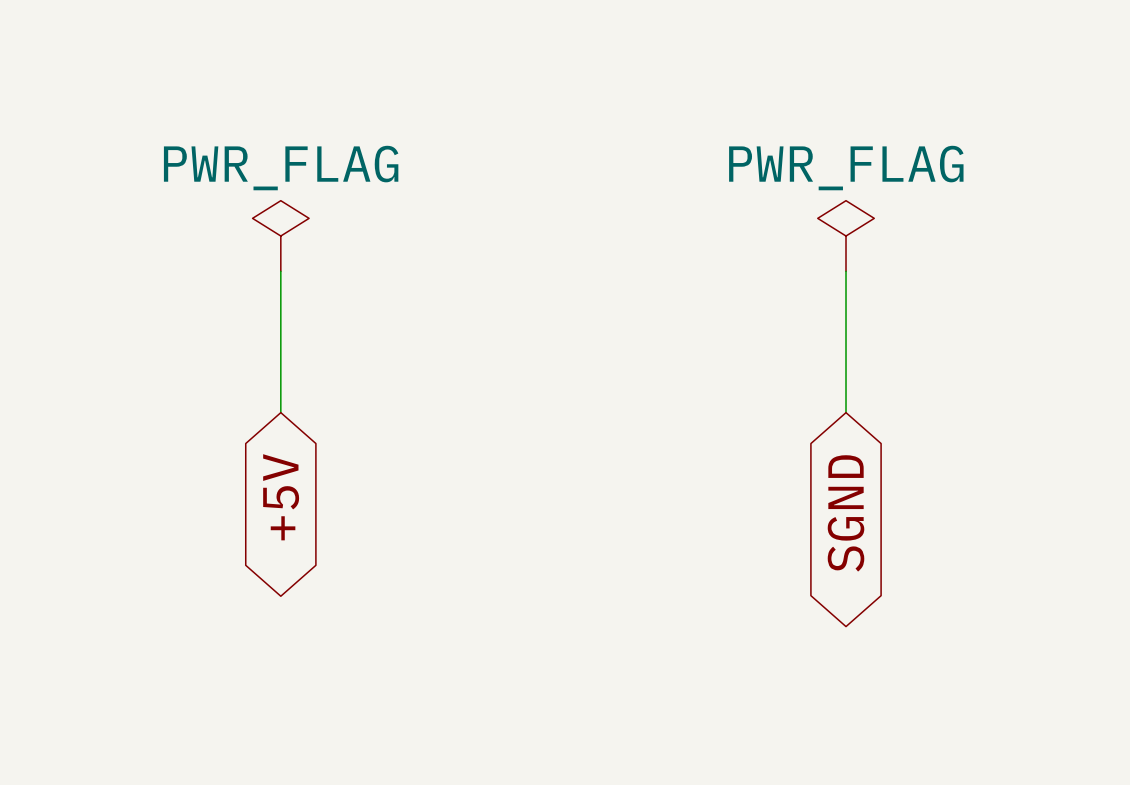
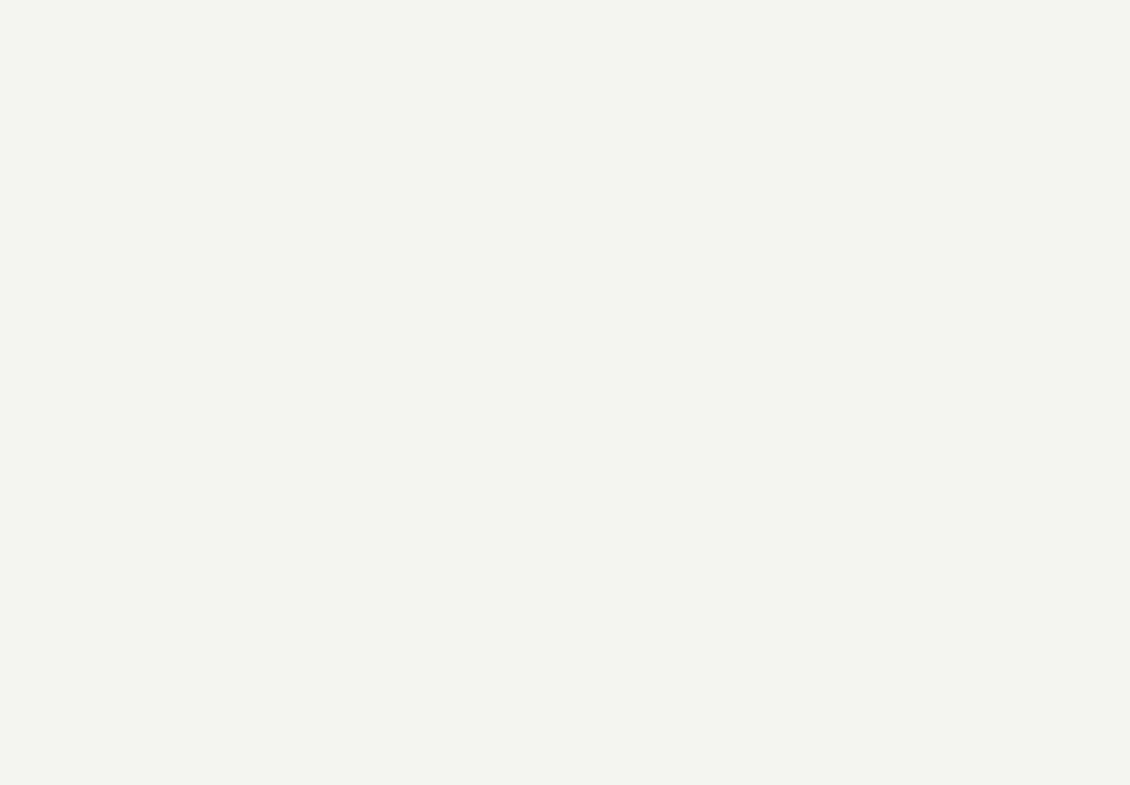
power symbol: PWR_FLAG (280, 236) -> none
power symbol: PWR_FLAG (846, 236) -> none
wire: (280, 271) (280, 412) -> none
wire: (846, 271) (846, 412) -> none
global label: +5V (281, 497) -> none
global label: SGND (846, 513) -> none

